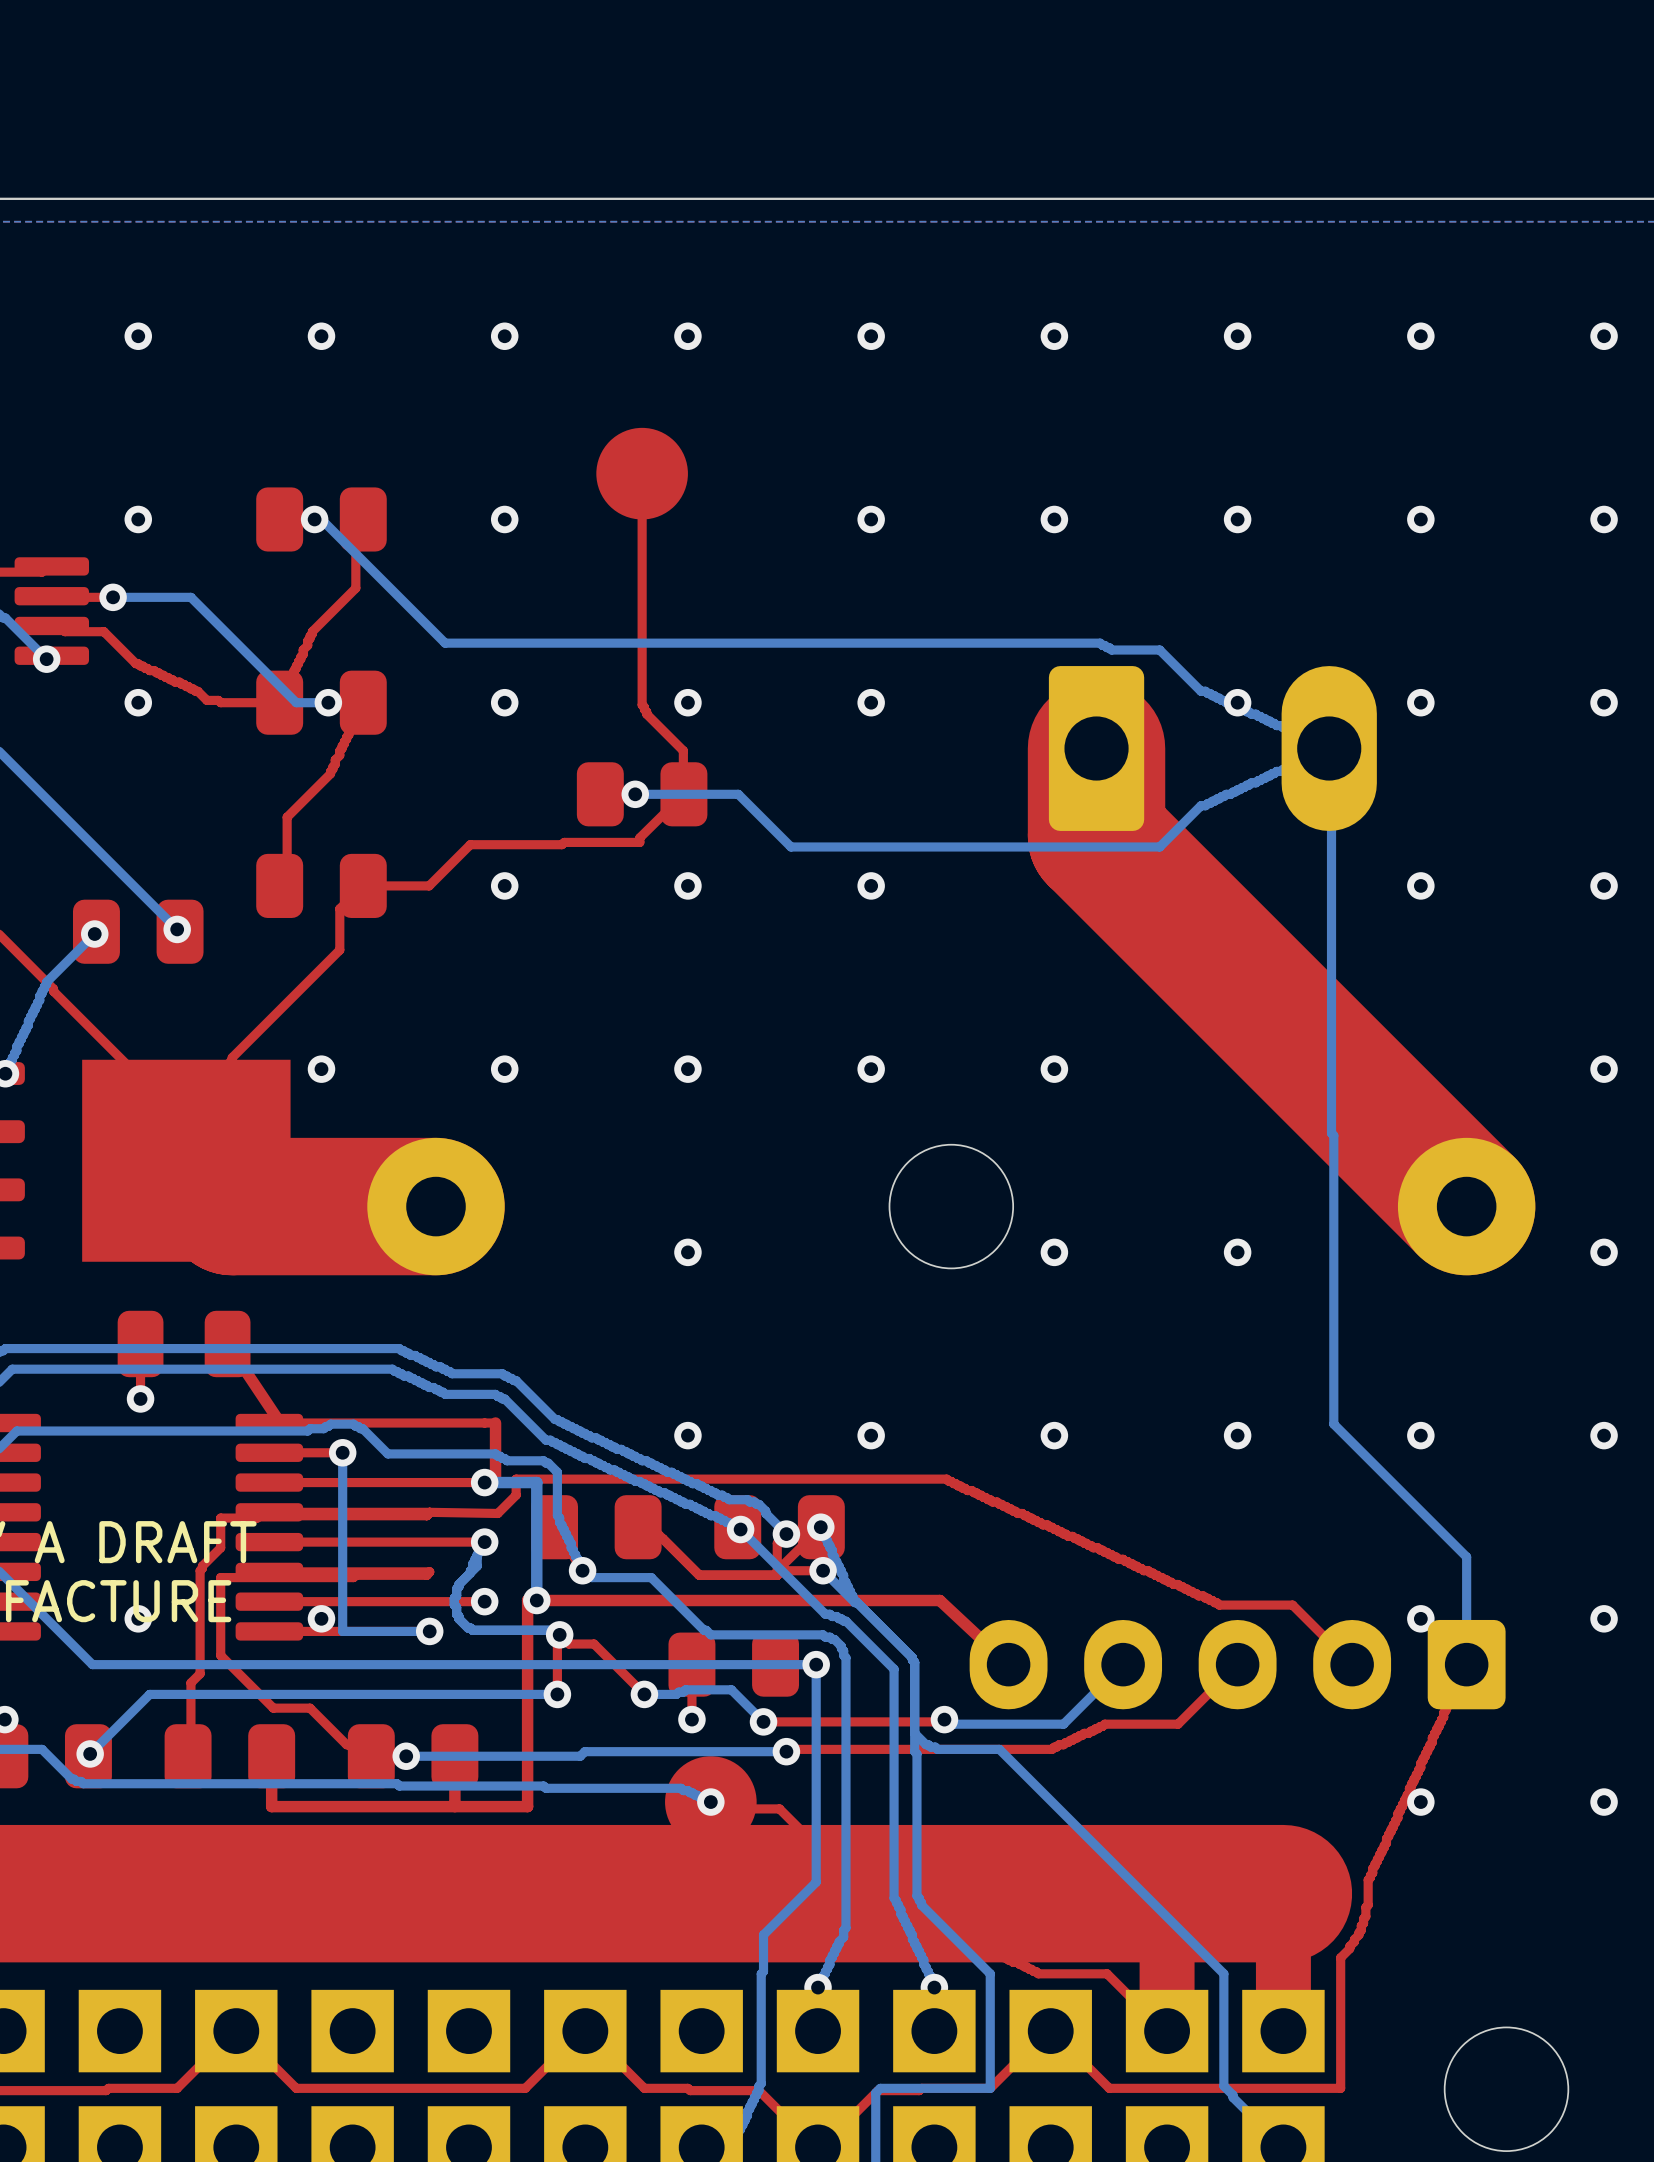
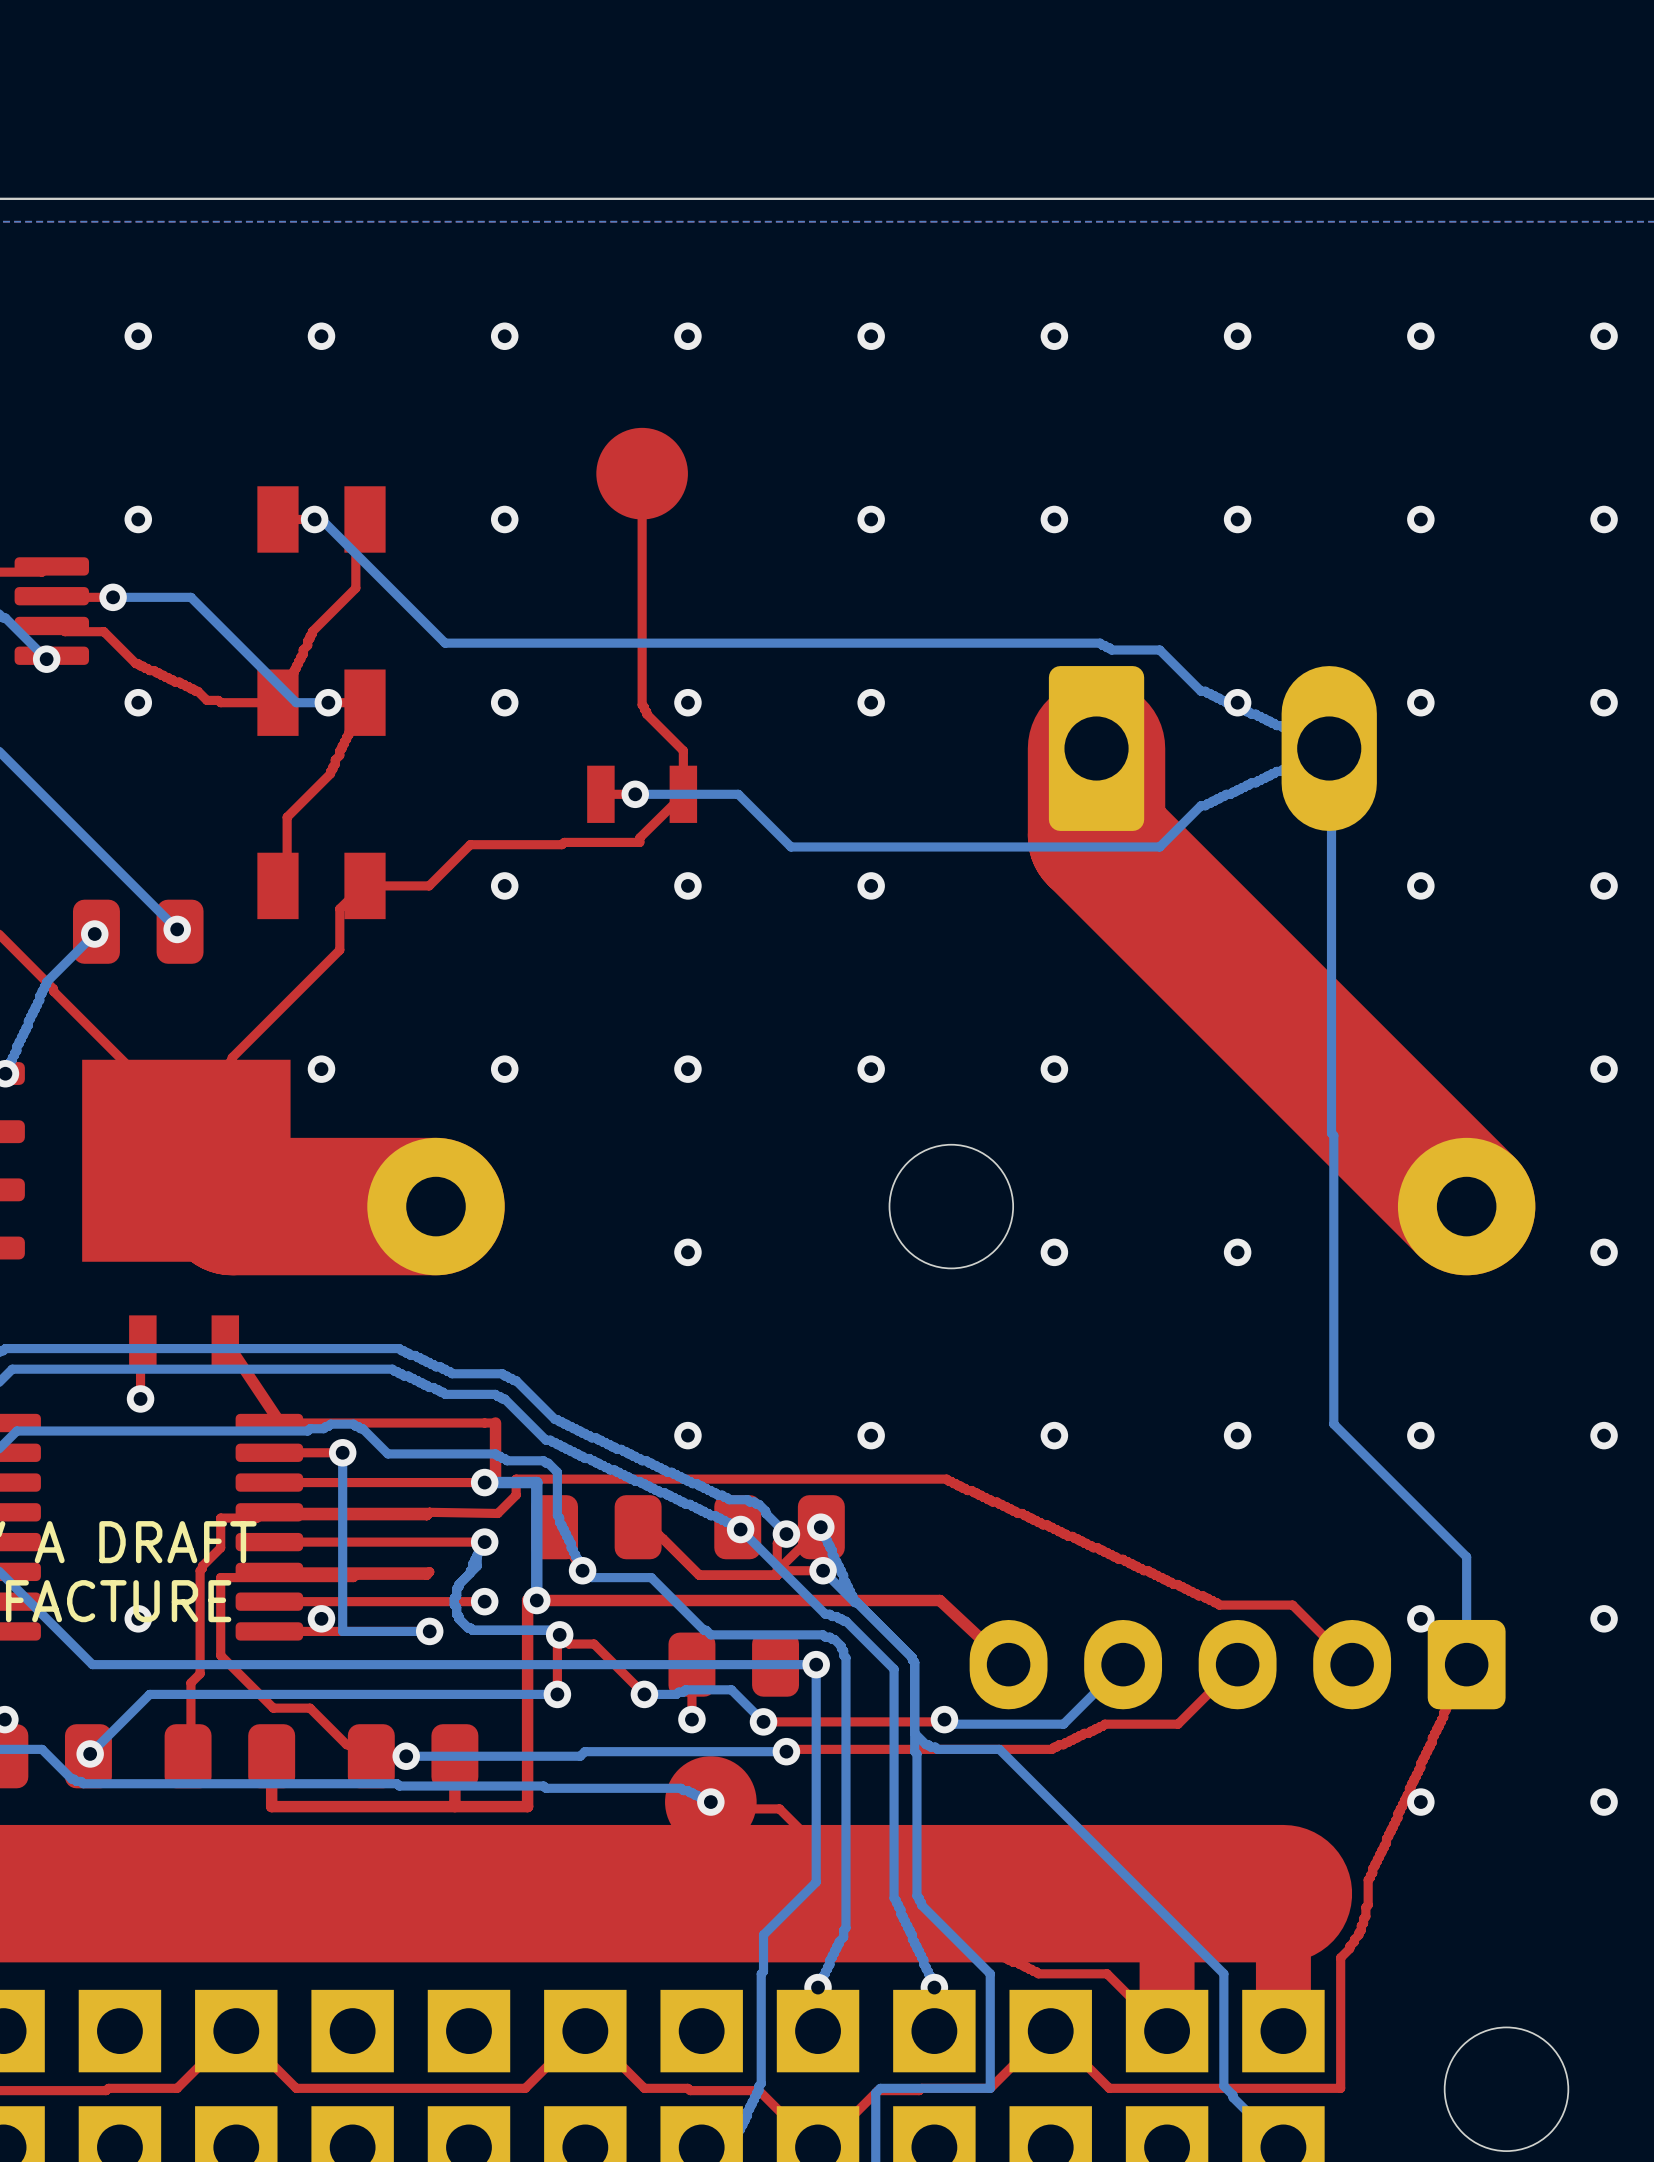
part footprint: [256, 487, 387, 552] -> [257, 486, 386, 553]
part footprint: [256, 670, 387, 735] -> [257, 669, 386, 736]
part footprint: [576, 762, 708, 827] -> [587, 765, 698, 823]
part footprint: [256, 853, 387, 918] -> [257, 852, 386, 920]
part footprint: [117, 1310, 251, 1378] -> [129, 1315, 240, 1373]

